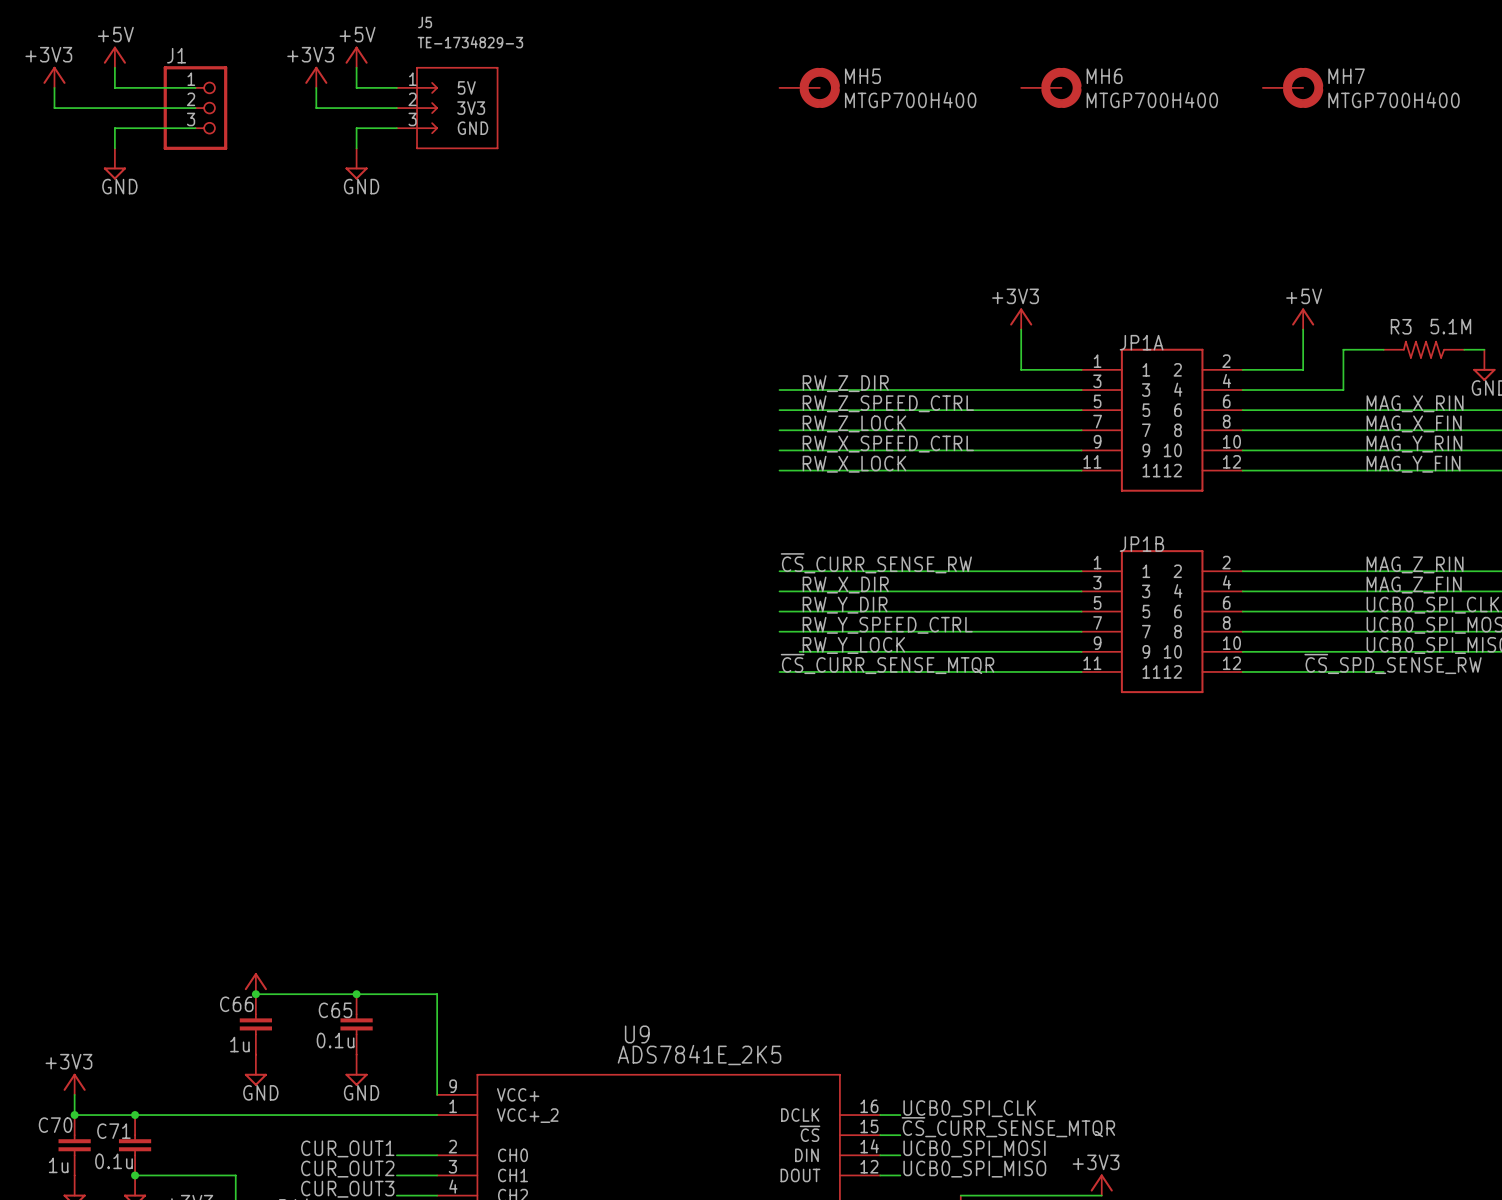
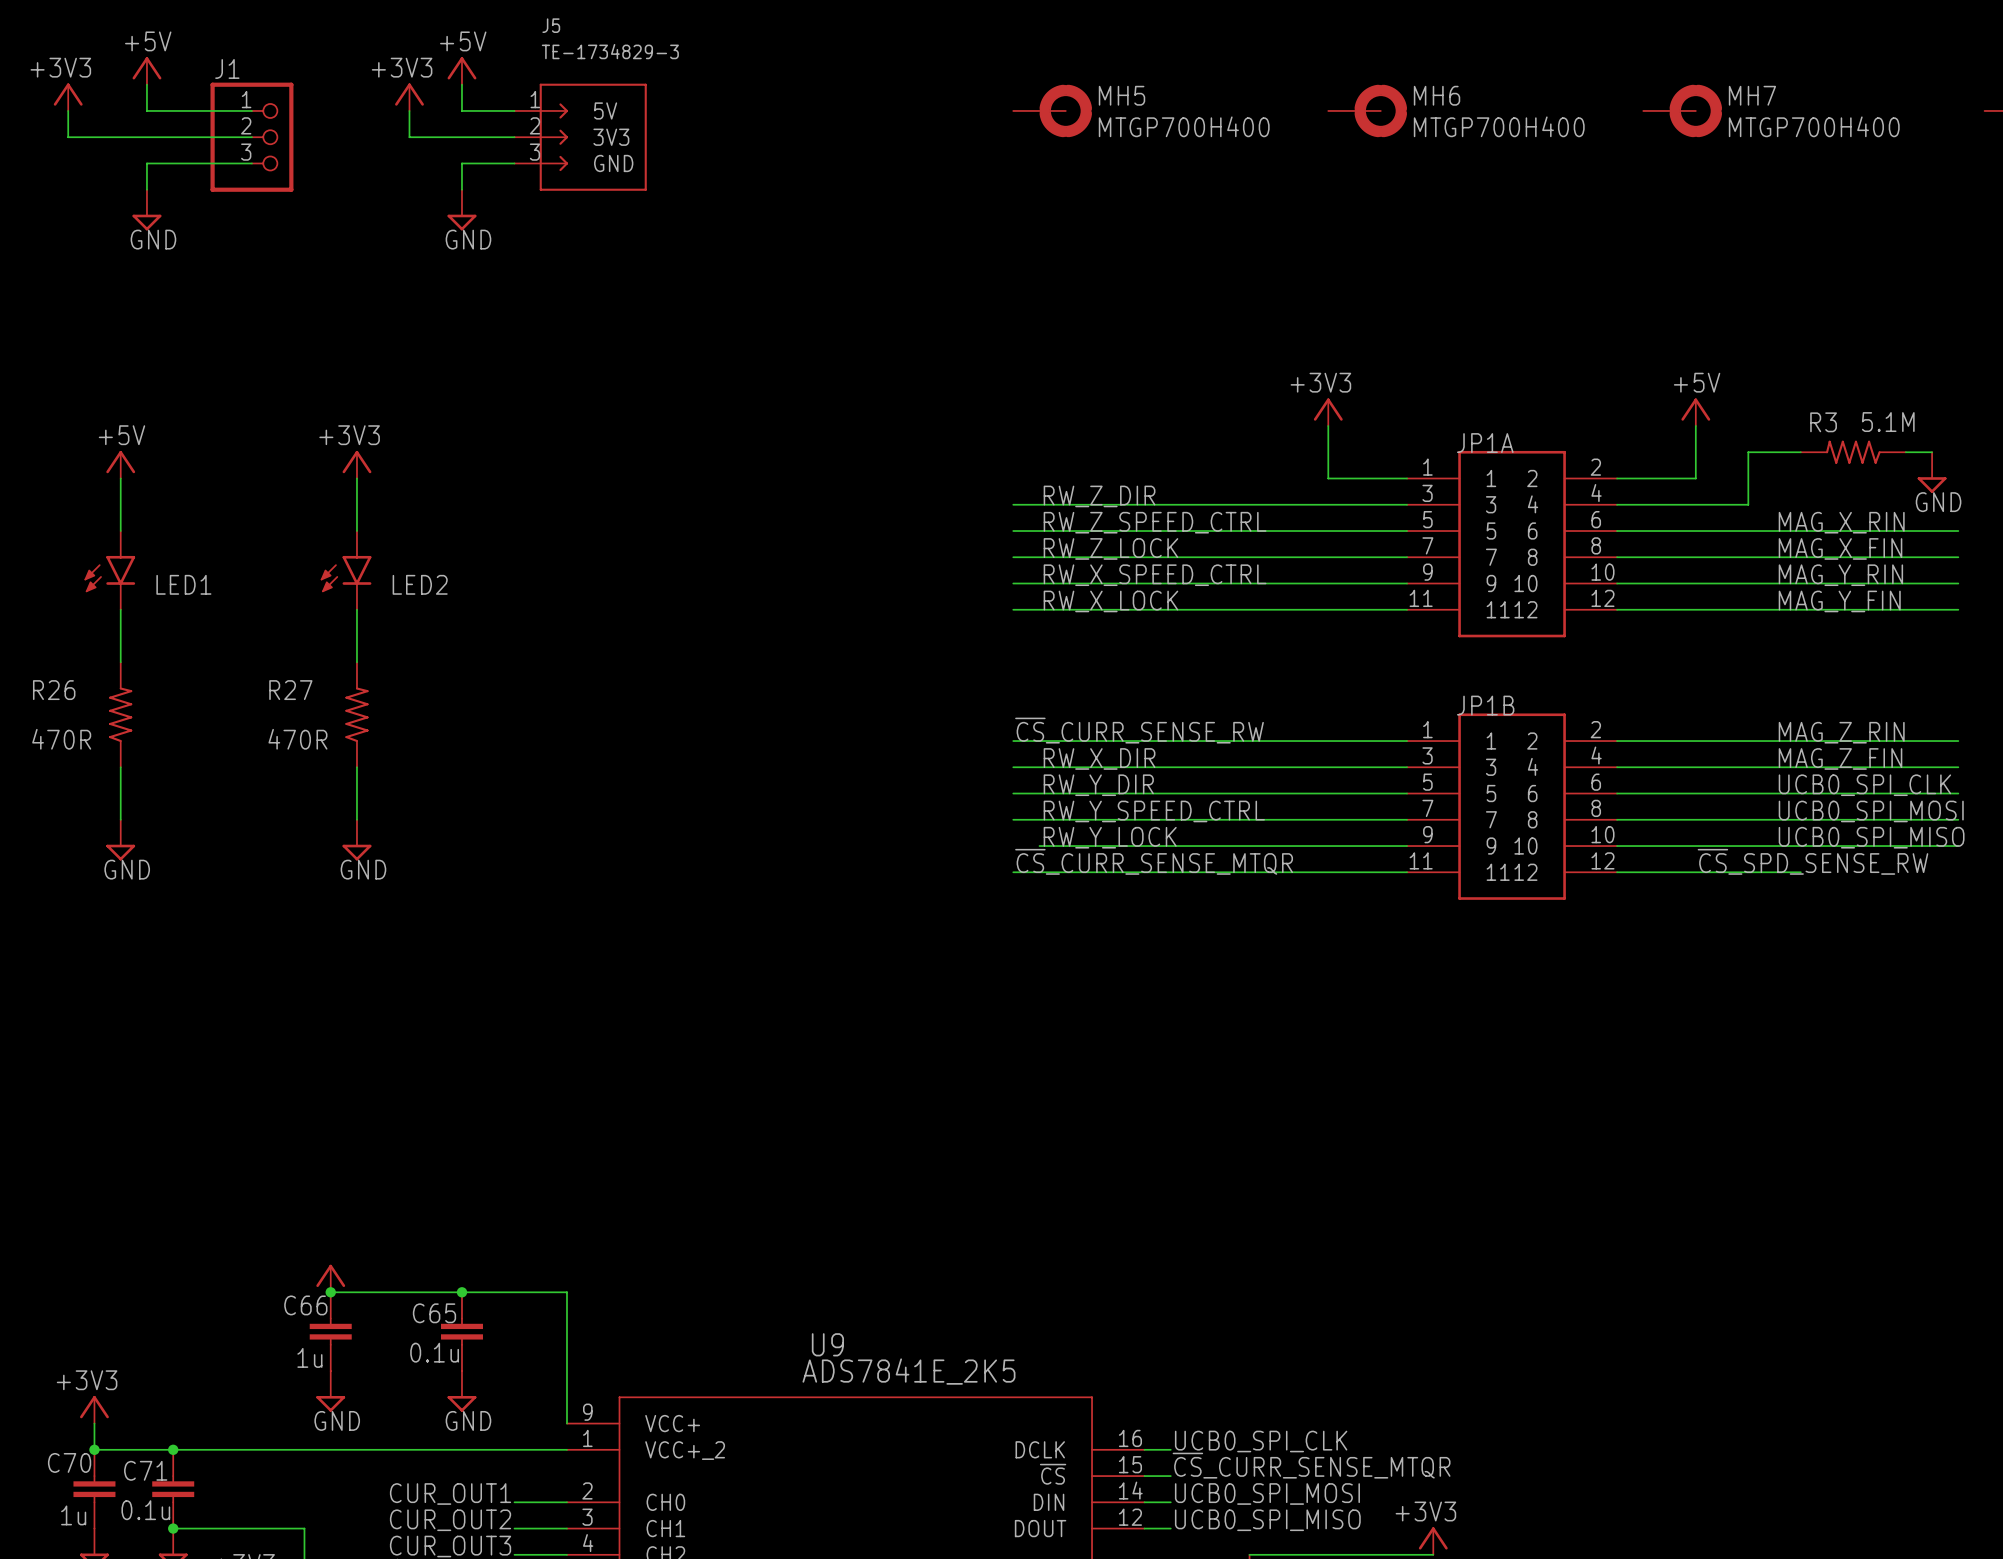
power symbol: none -> +5V (120, 464)
power symbol: none -> +3V3 (356, 464)
wire: none -> (120, 478) (120, 531)
wire: none -> (356, 478) (356, 531)
LED1: none -> (109, 570)
LED2: none -> (346, 570)
wire: none -> (120, 609) (120, 662)
wire: none -> (356, 609) (356, 662)
R26: none -> 470R (120, 714)
R27: none -> 470R (356, 714)
wire: none -> (120, 767) (120, 819)
wire: none -> (356, 767) (356, 819)
power symbol: none -> GND (120, 840)
power symbol: none -> GND (356, 840)

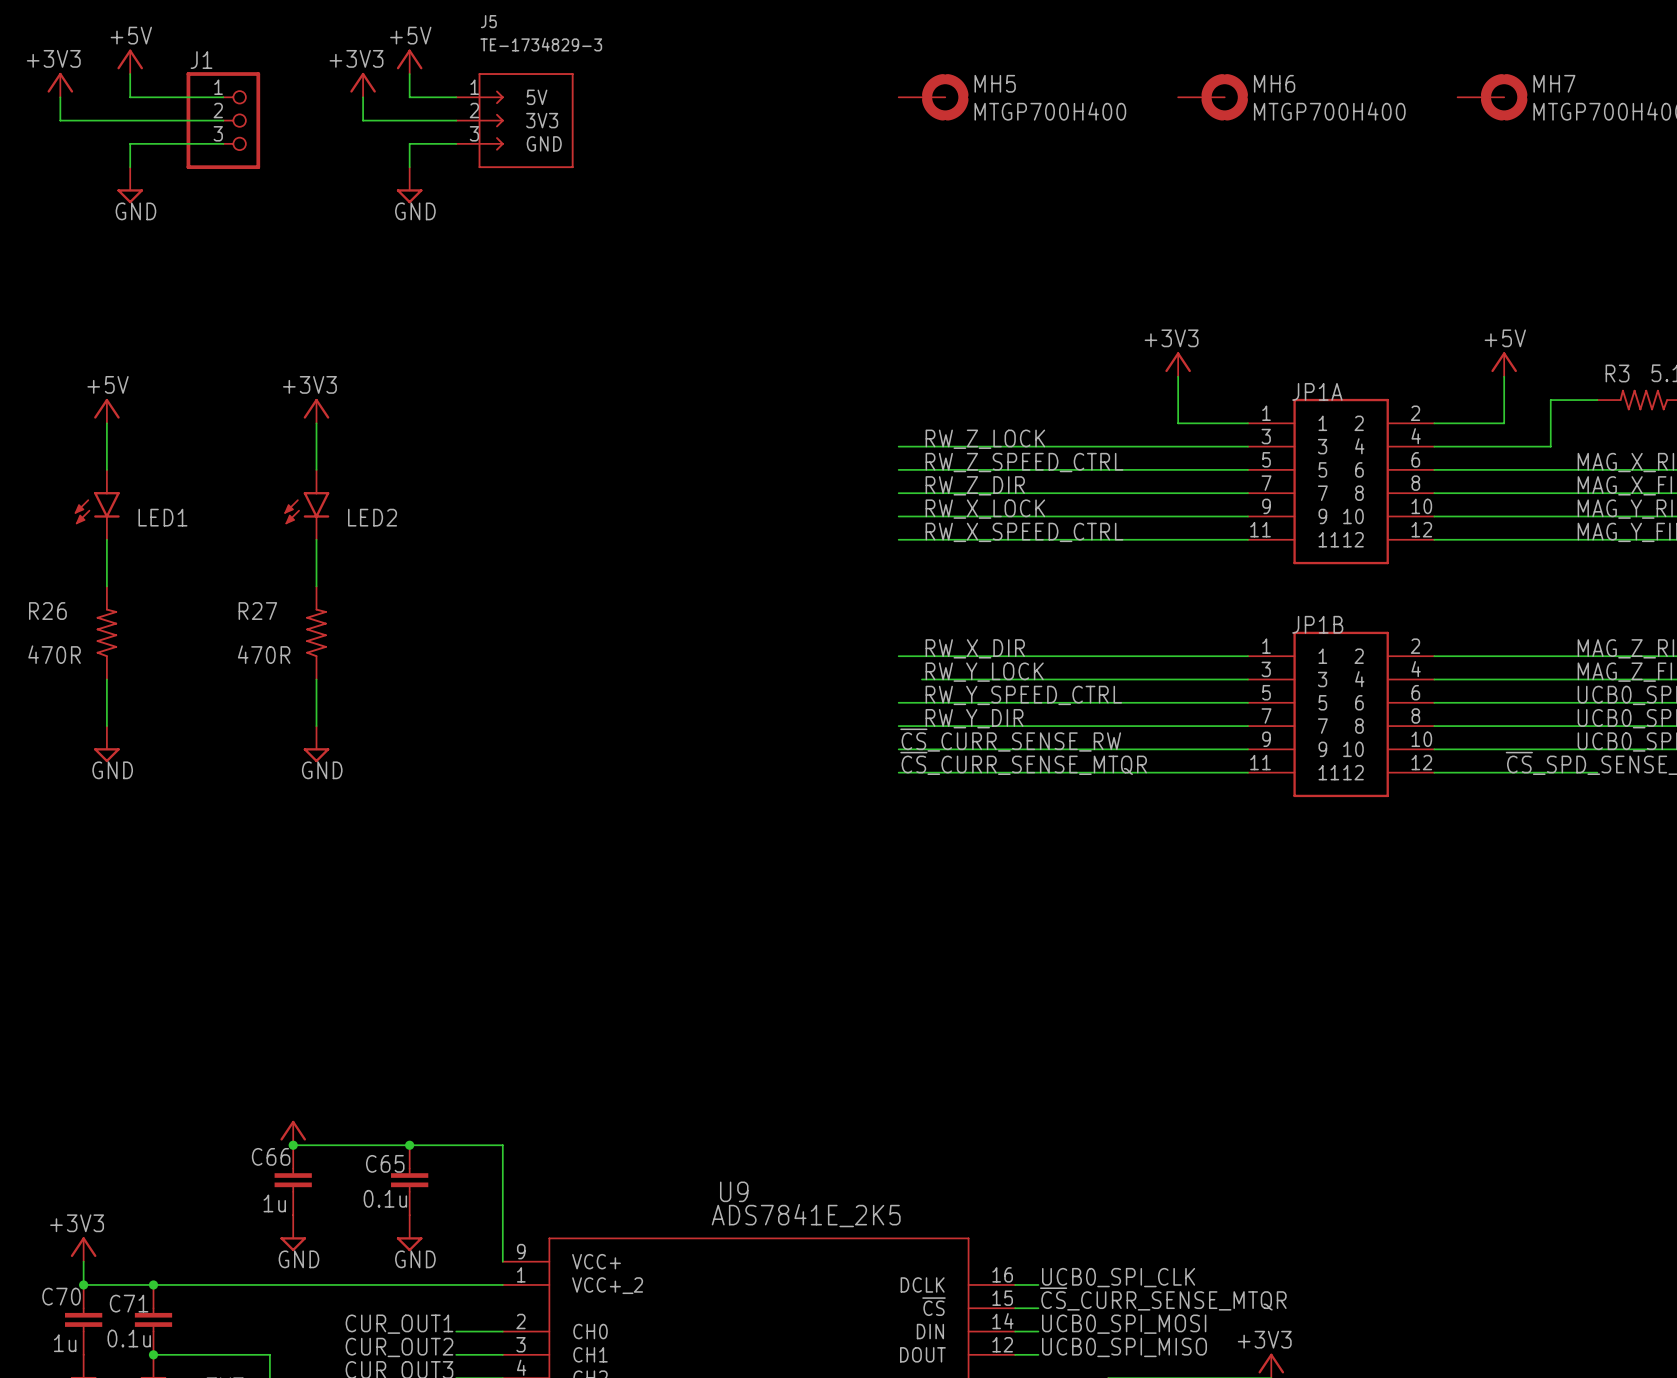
label: RW_Z_DIR (1099, 496) -> RW_Z_LOCK (985, 439)
label: RW_Z_LOCK (1110, 548) -> RW_Z_DIR (975, 485)
label: RW_X_SPEED_CTRL (1155, 575) -> RW_X_LOCK (985, 509)
label: RW_X_LOCK (1110, 601) -> RW_X_SPEED_CTRL (1024, 532)
label position: ~{CS}_CURR_SENSE_RW (1139, 730) -> ~{CS}_CURR_SENSE_RW (1010, 740)
label: none -> RW_X_DIR (975, 648)
label: RW_X_DIR (1099, 758) -> RW_Y_LOCK (984, 672)
wire: (1013, 767) (1039, 767) -> (898, 749) (921, 749)
label: RW_Y_DIR (1098, 785) -> RW_Y_SPEED_CTRL (1023, 695)
label: RW_Y_SPEED_CTRL (1154, 811) -> RW_Y_DIR (974, 718)
label: RW_Y_LOCK (1110, 837) -> none

